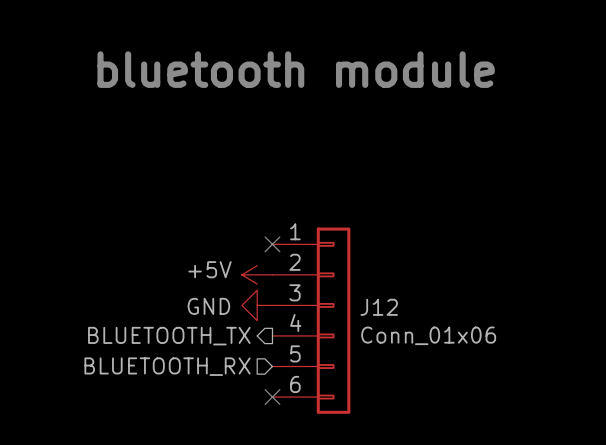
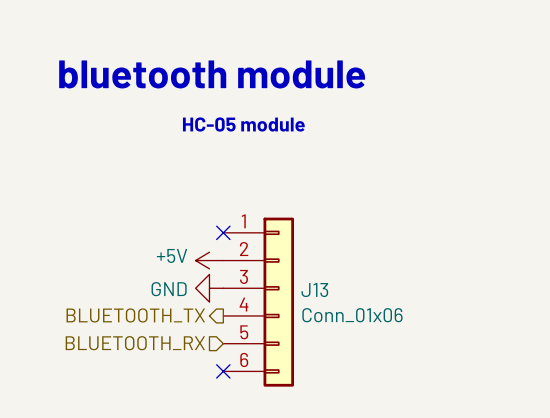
text: none -> HC-05 module (243, 124)
J12 name: J12 (379, 307) -> J13 (314, 290)

